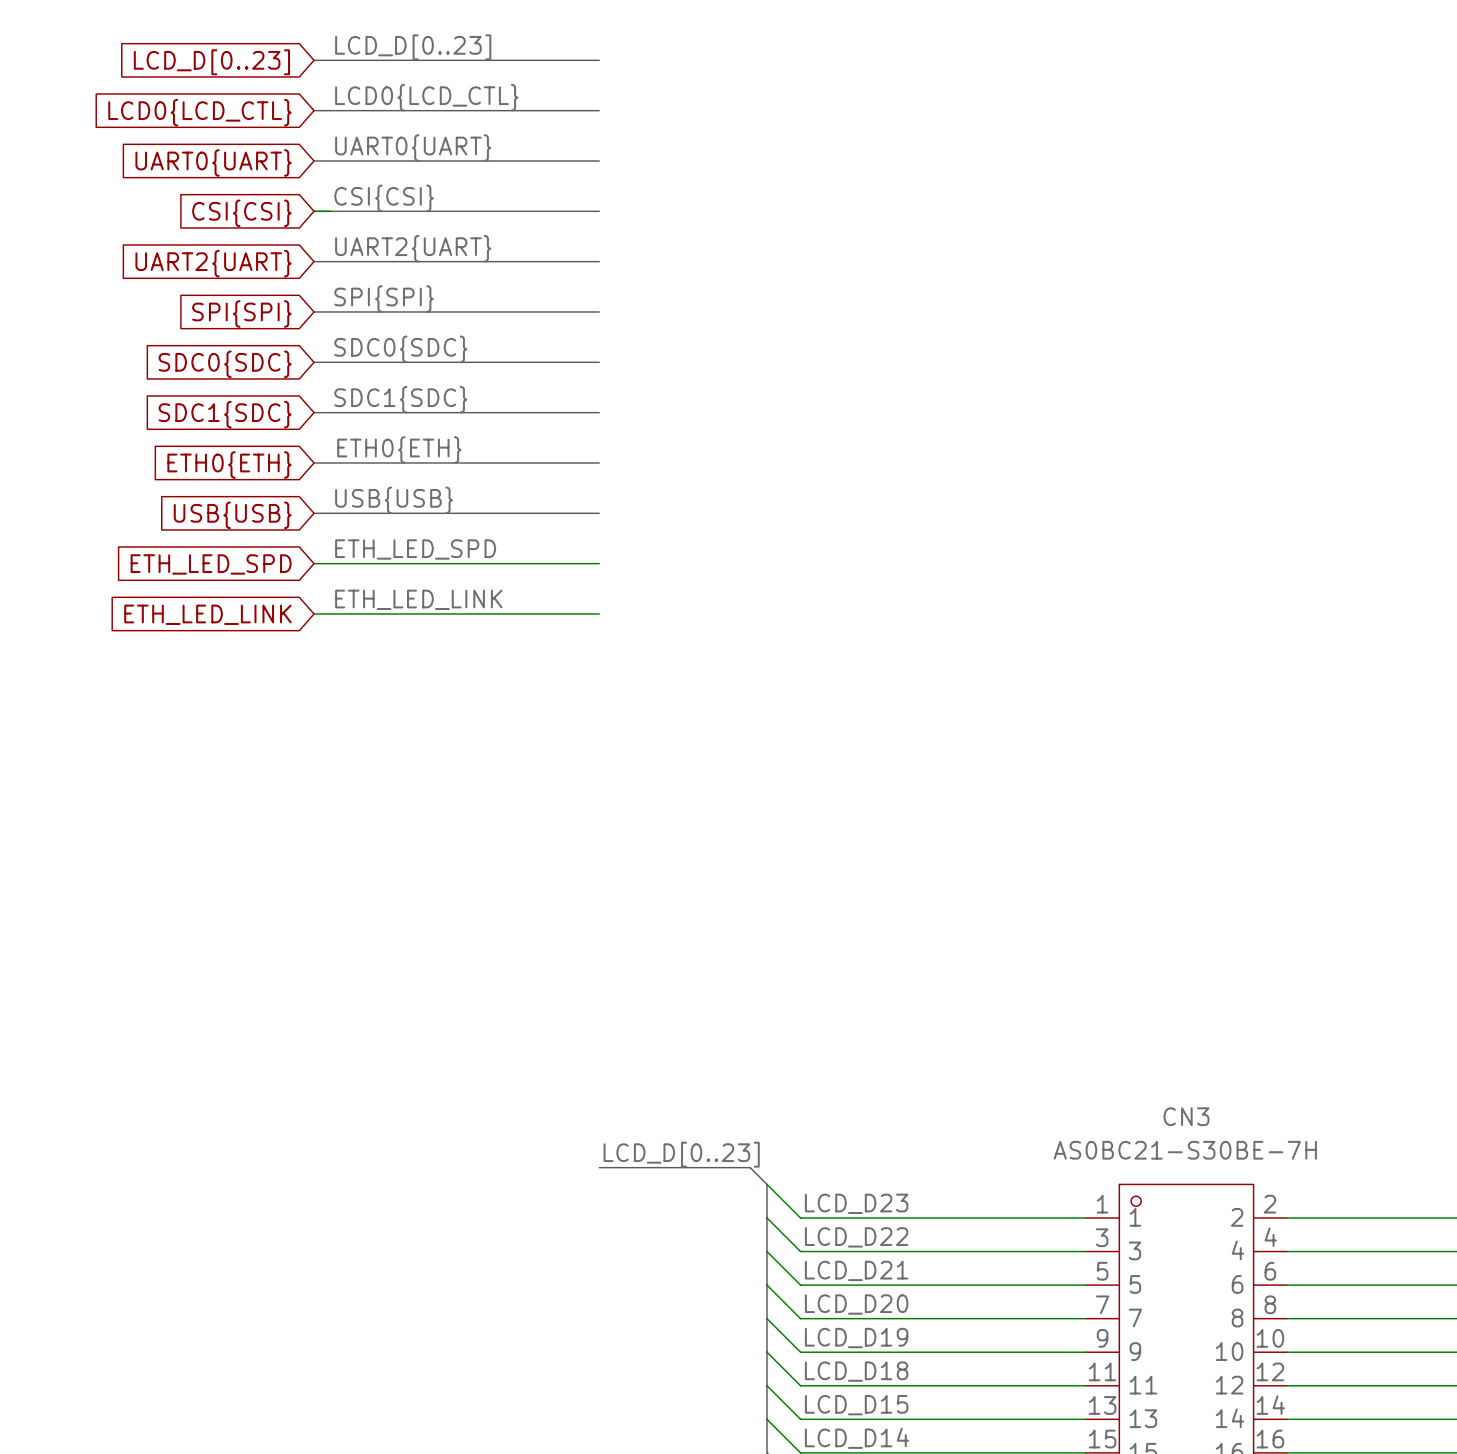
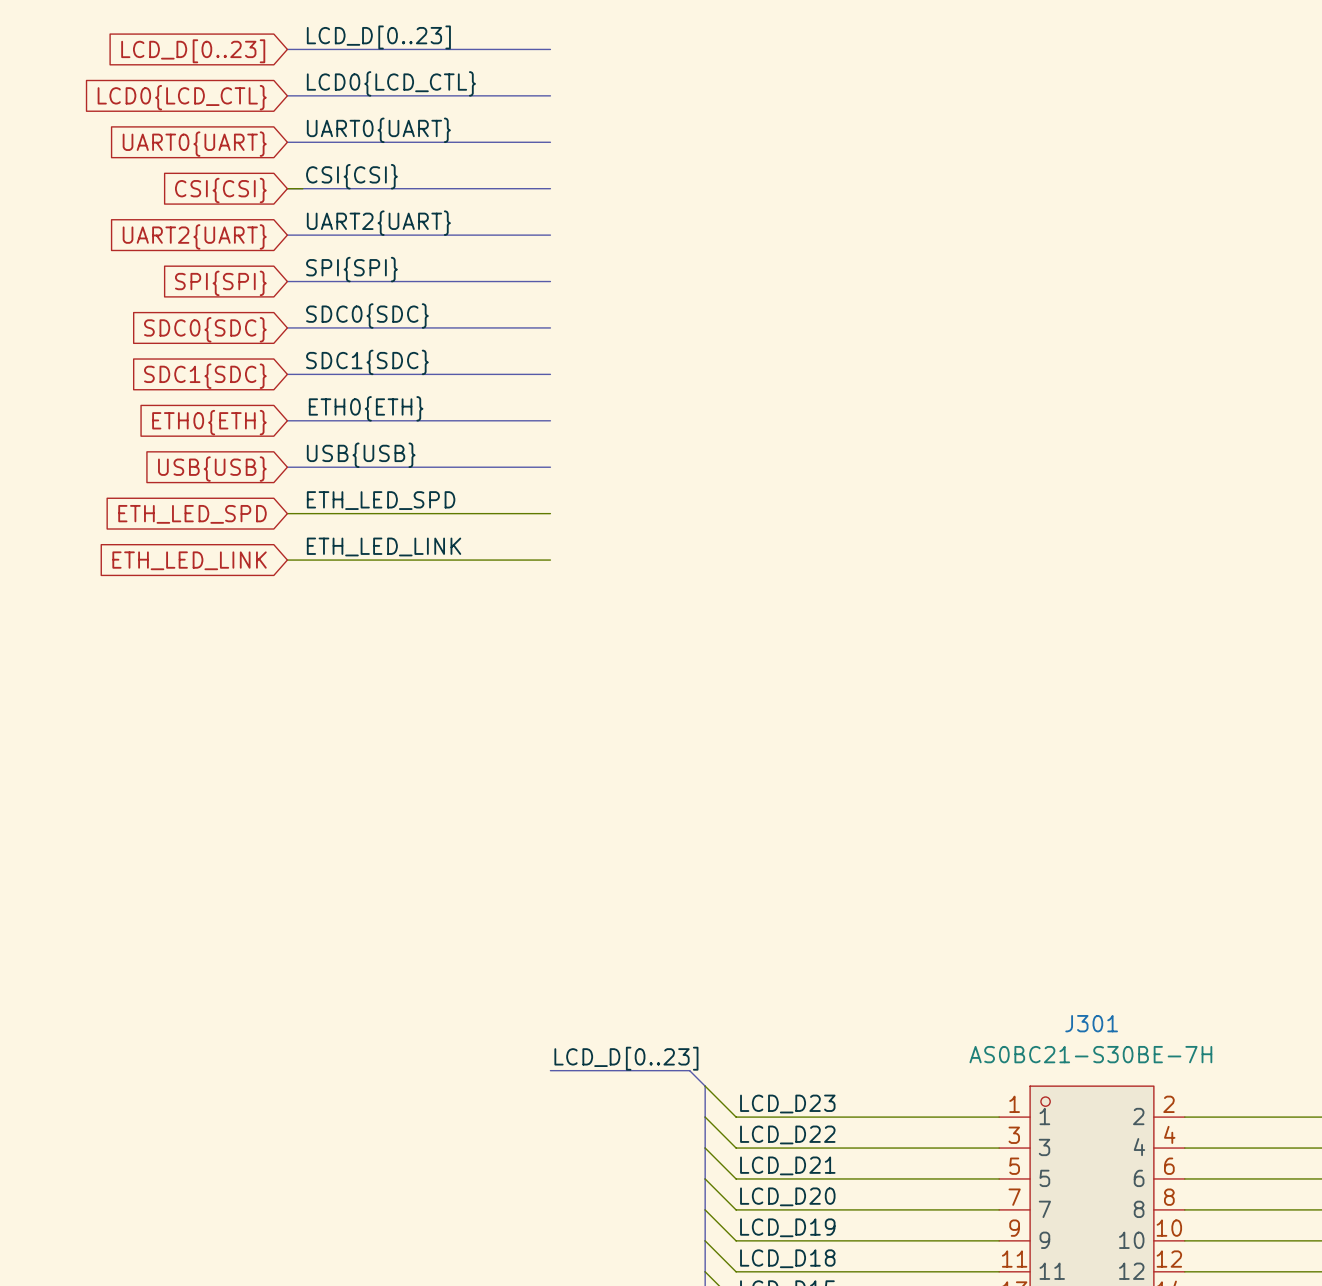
CN3 name: CN3 (1186, 1116) -> J301 (1091, 1023)

